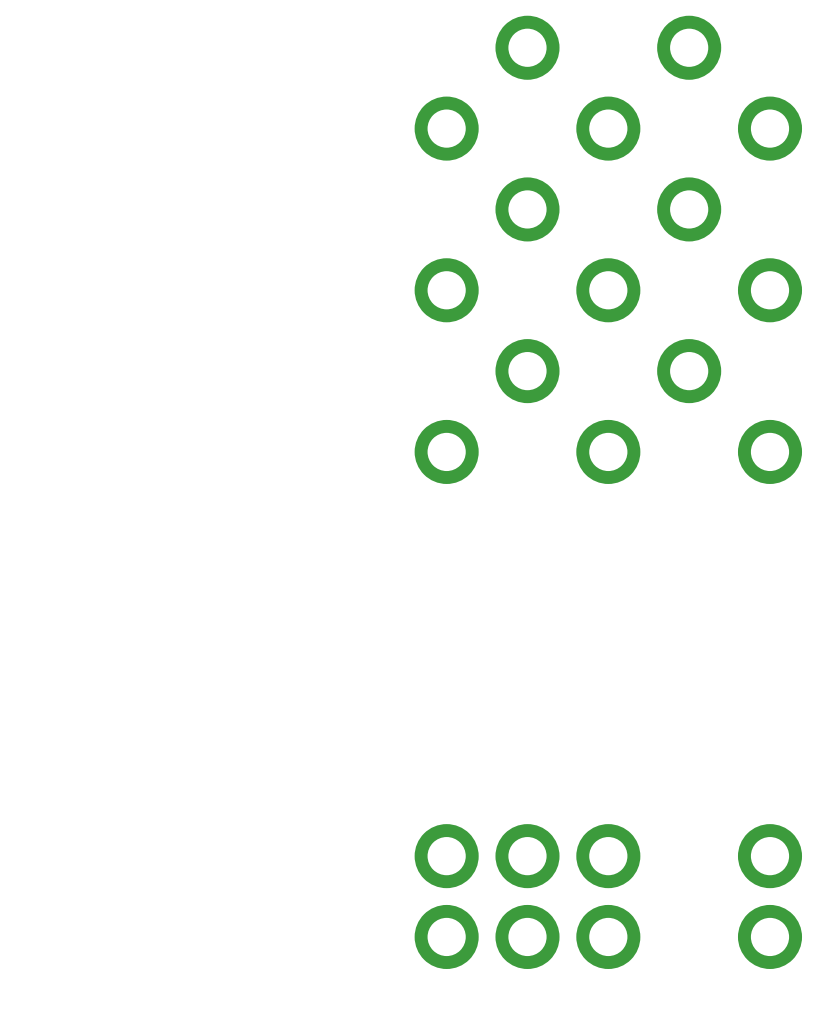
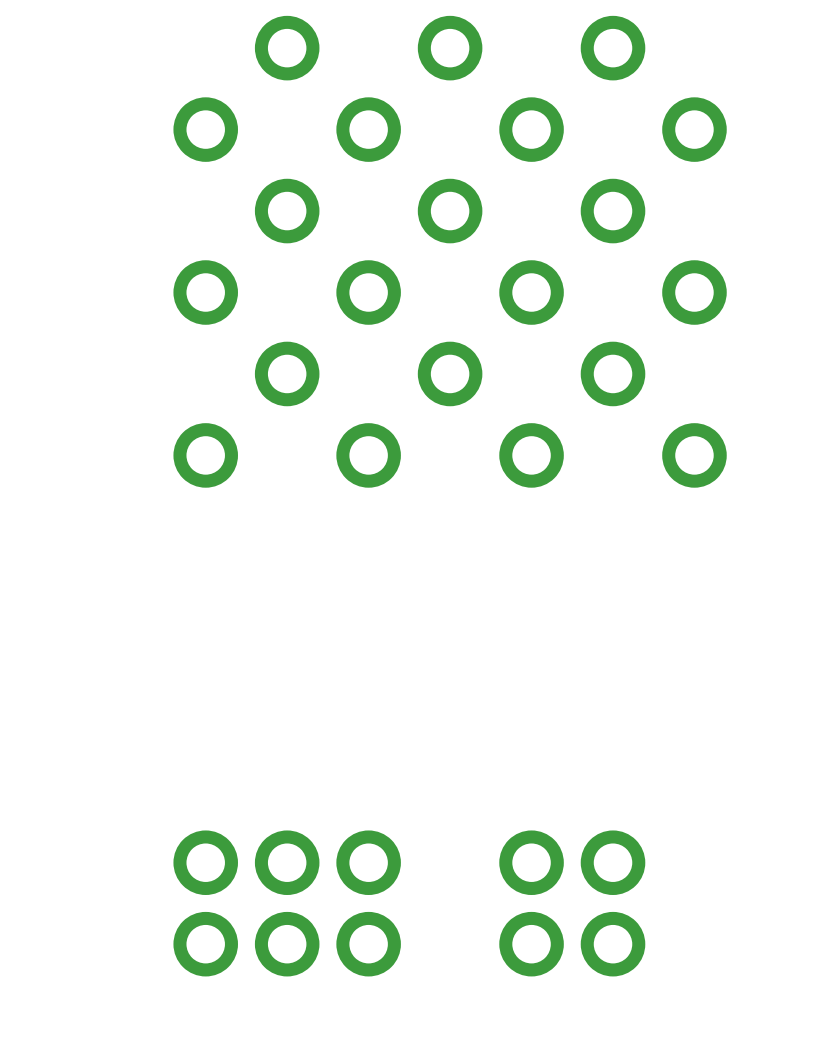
via: none -> (287, 48)
via: none -> (450, 48)
via: (527, 47) -> none
via: none -> (613, 48)
via: (689, 47) -> none
via: none -> (205, 129)
via: none -> (368, 129)
via: (446, 128) -> none
via: none -> (531, 129)
via: (608, 128) -> none
via: none -> (694, 129)
via: (770, 128) -> none
via: none -> (287, 211)
via: none -> (450, 211)
via: (527, 209) -> none
via: none -> (613, 211)
via: (689, 209) -> none
via: none -> (205, 292)
via: none -> (368, 292)
via: (446, 290) -> none
via: none -> (531, 292)
via: (608, 290) -> none
via: none -> (694, 292)
via: (770, 290) -> none
via: none -> (287, 373)
via: none -> (450, 373)
via: (527, 371) -> none
via: none -> (613, 373)
via: (689, 371) -> none
via: none -> (205, 455)
via: none -> (368, 455)
via: (446, 451) -> none
via: none -> (531, 455)
via: (608, 451) -> none
via: none -> (694, 455)
via: (770, 451) -> none
via: none -> (205, 862)
via: none -> (287, 862)
via: none -> (368, 862)
via: (446, 856) -> none
via: (770, 856) -> none
via: none -> (205, 944)
via: none -> (287, 944)
via: none -> (368, 944)
via: (446, 936) -> none
via: (770, 936) -> none

